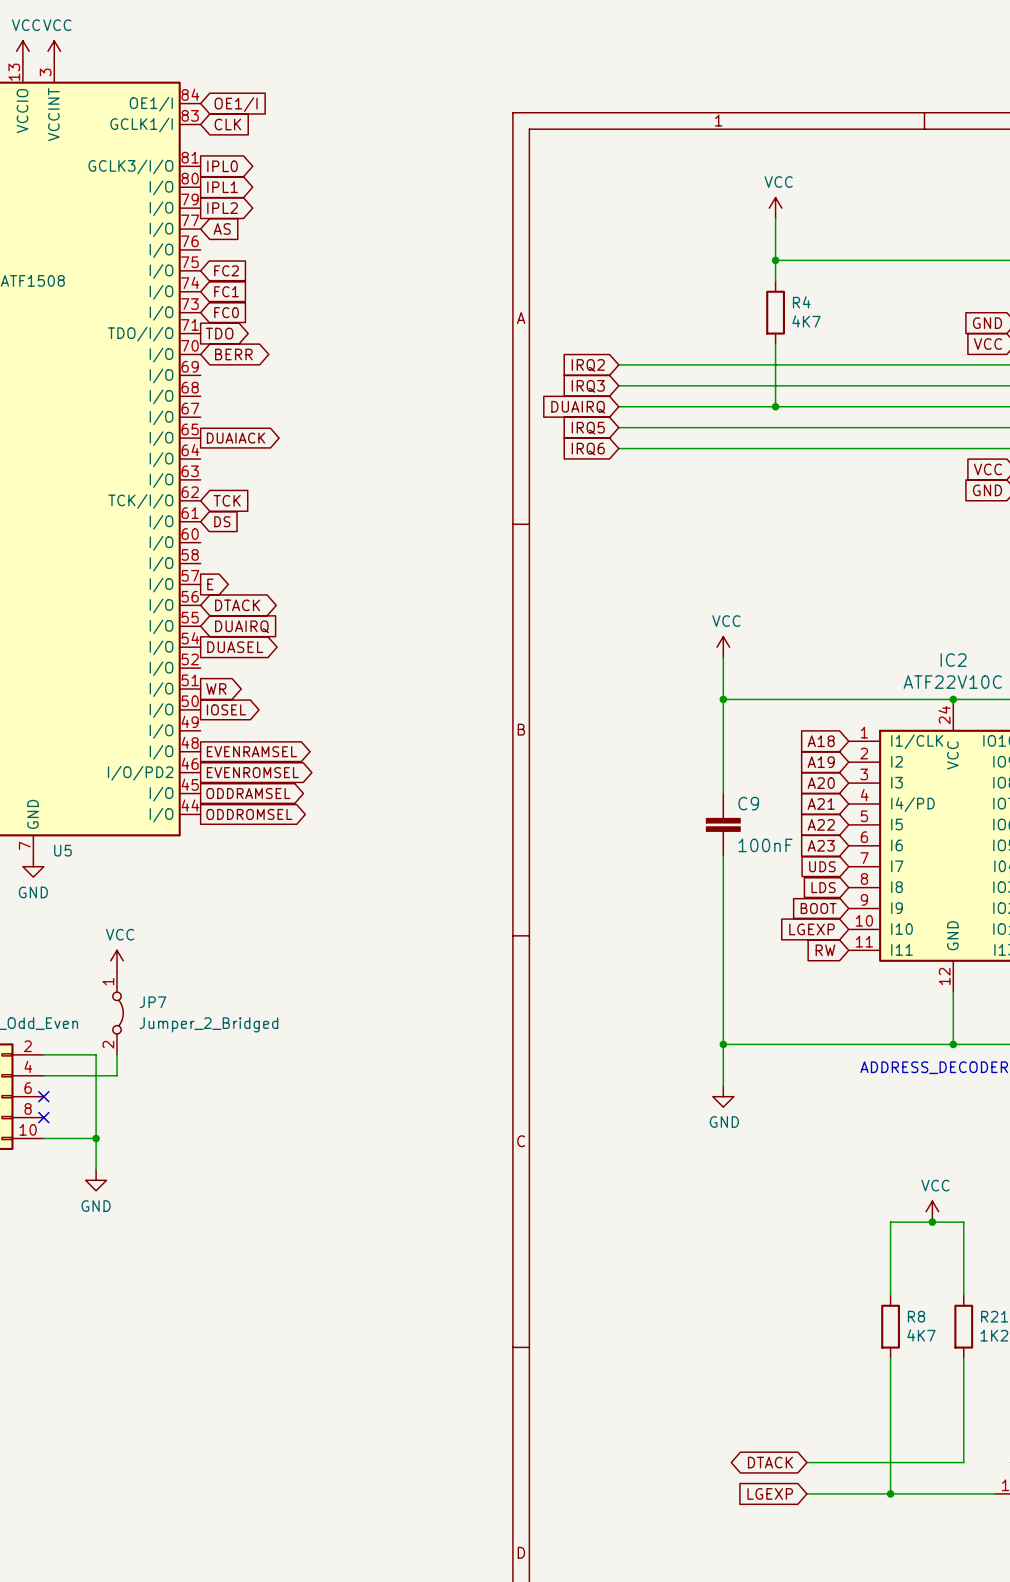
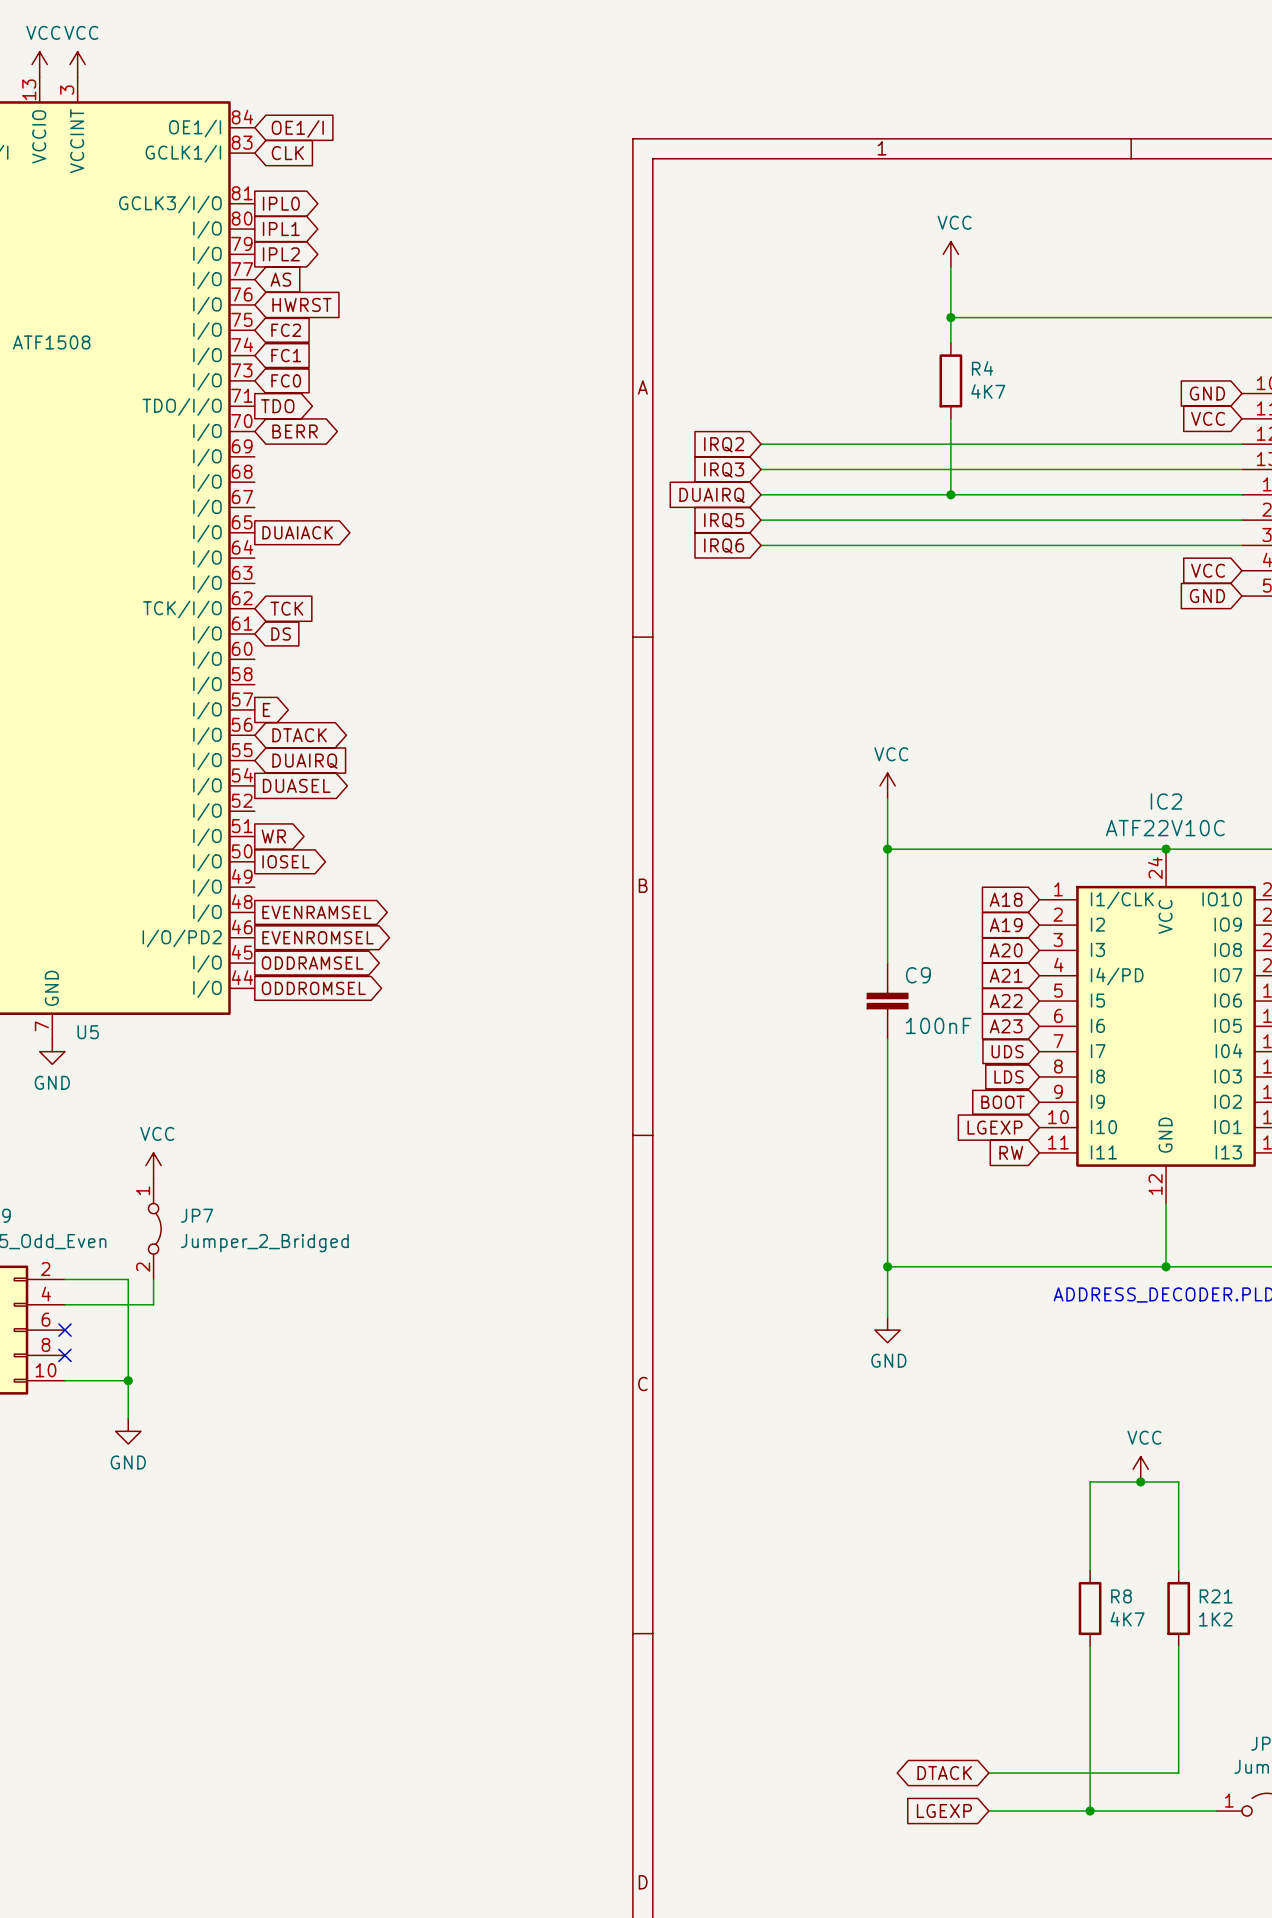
global label: none -> HWRST (301, 304)

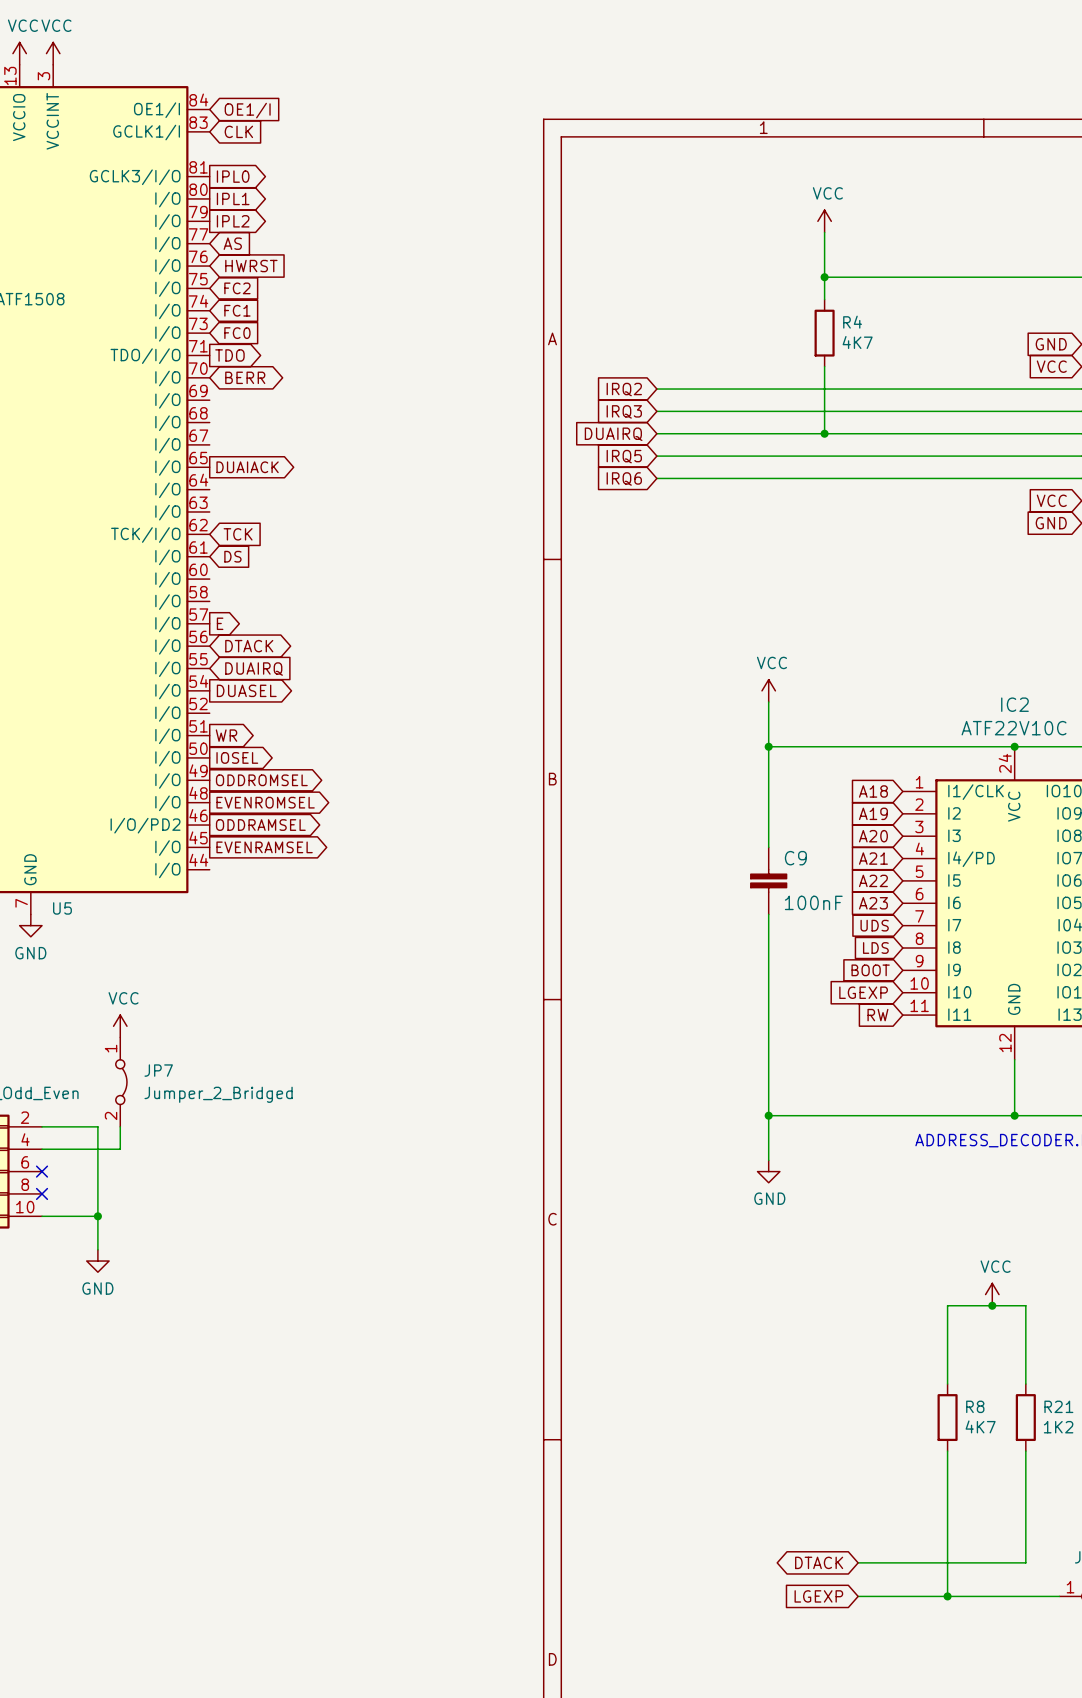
global label: EVENRAMSEL (316, 912) -> EVENROMSEL (265, 802)
global label: EVENROMSEL (318, 937) -> ODDRAMSEL (260, 825)
global label: ODDRAMSEL (312, 963) -> EVENRAMSEL (264, 847)
global label position: ODDROMSEL (313, 988) -> ODDROMSEL (261, 780)

